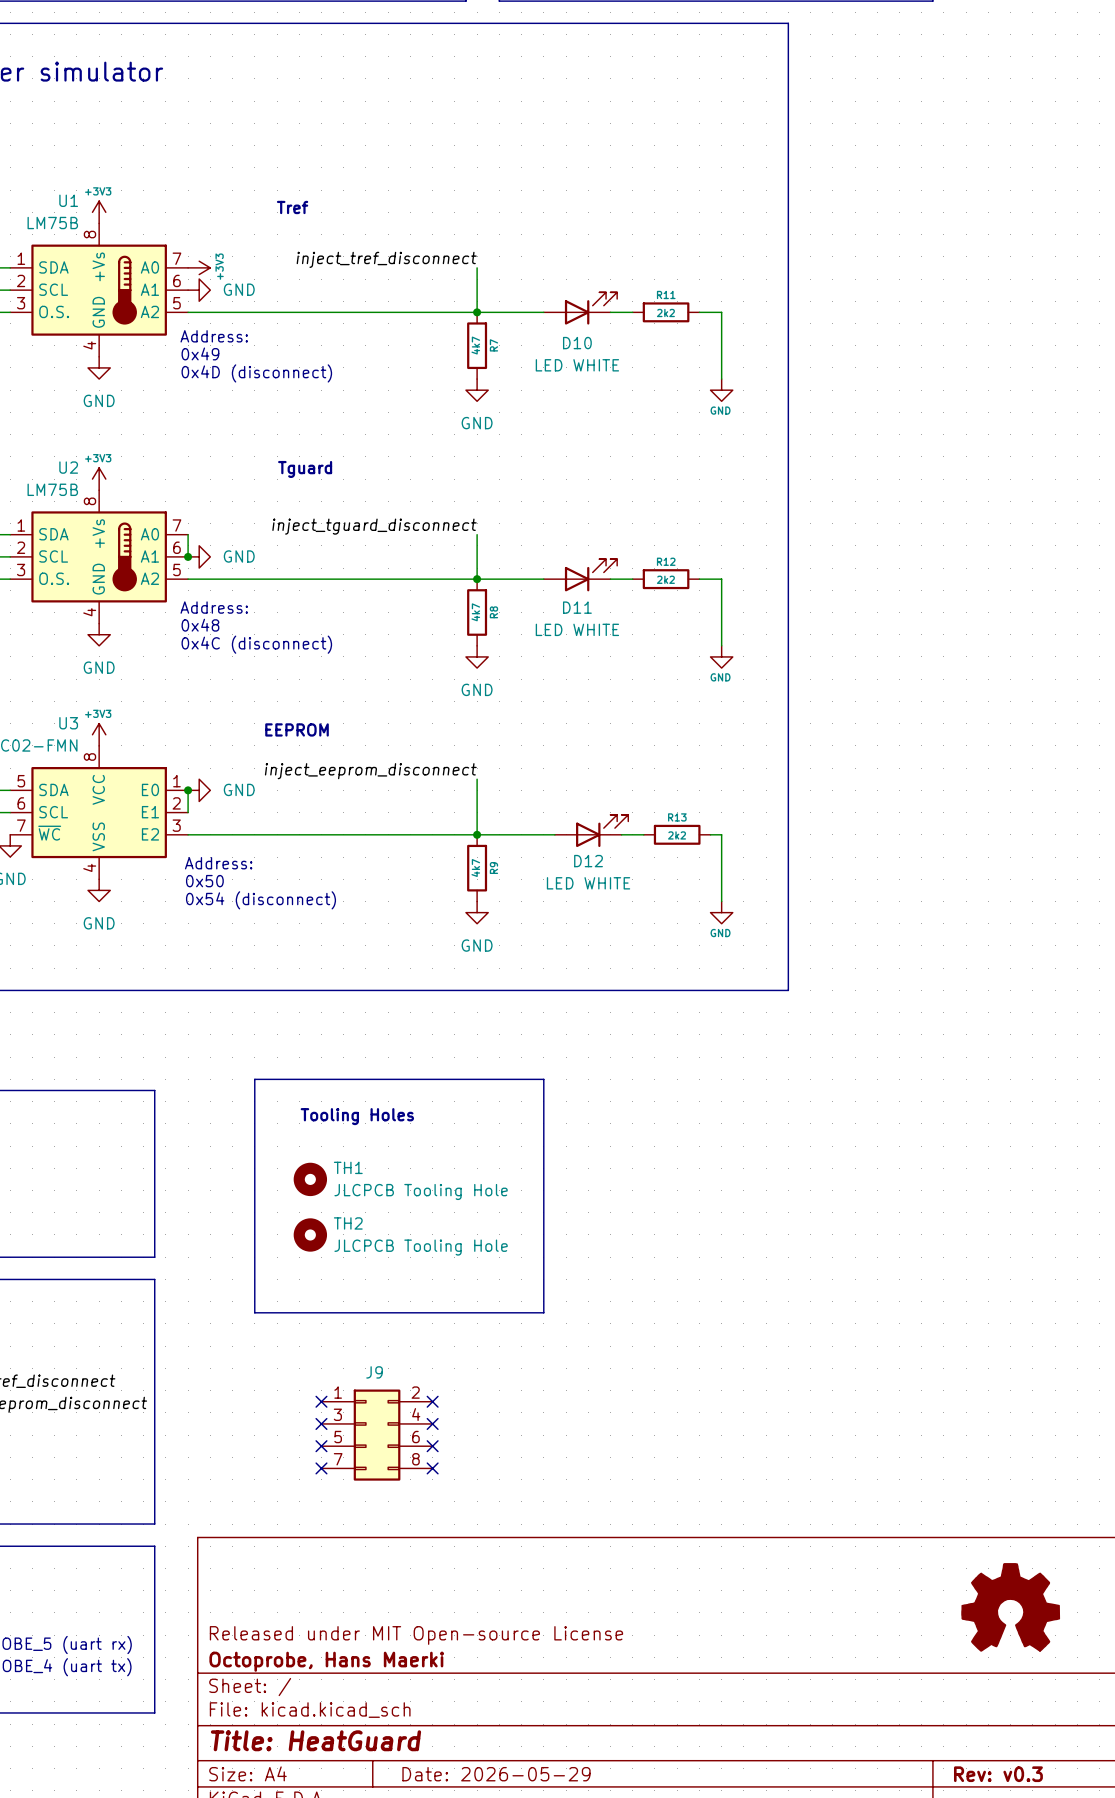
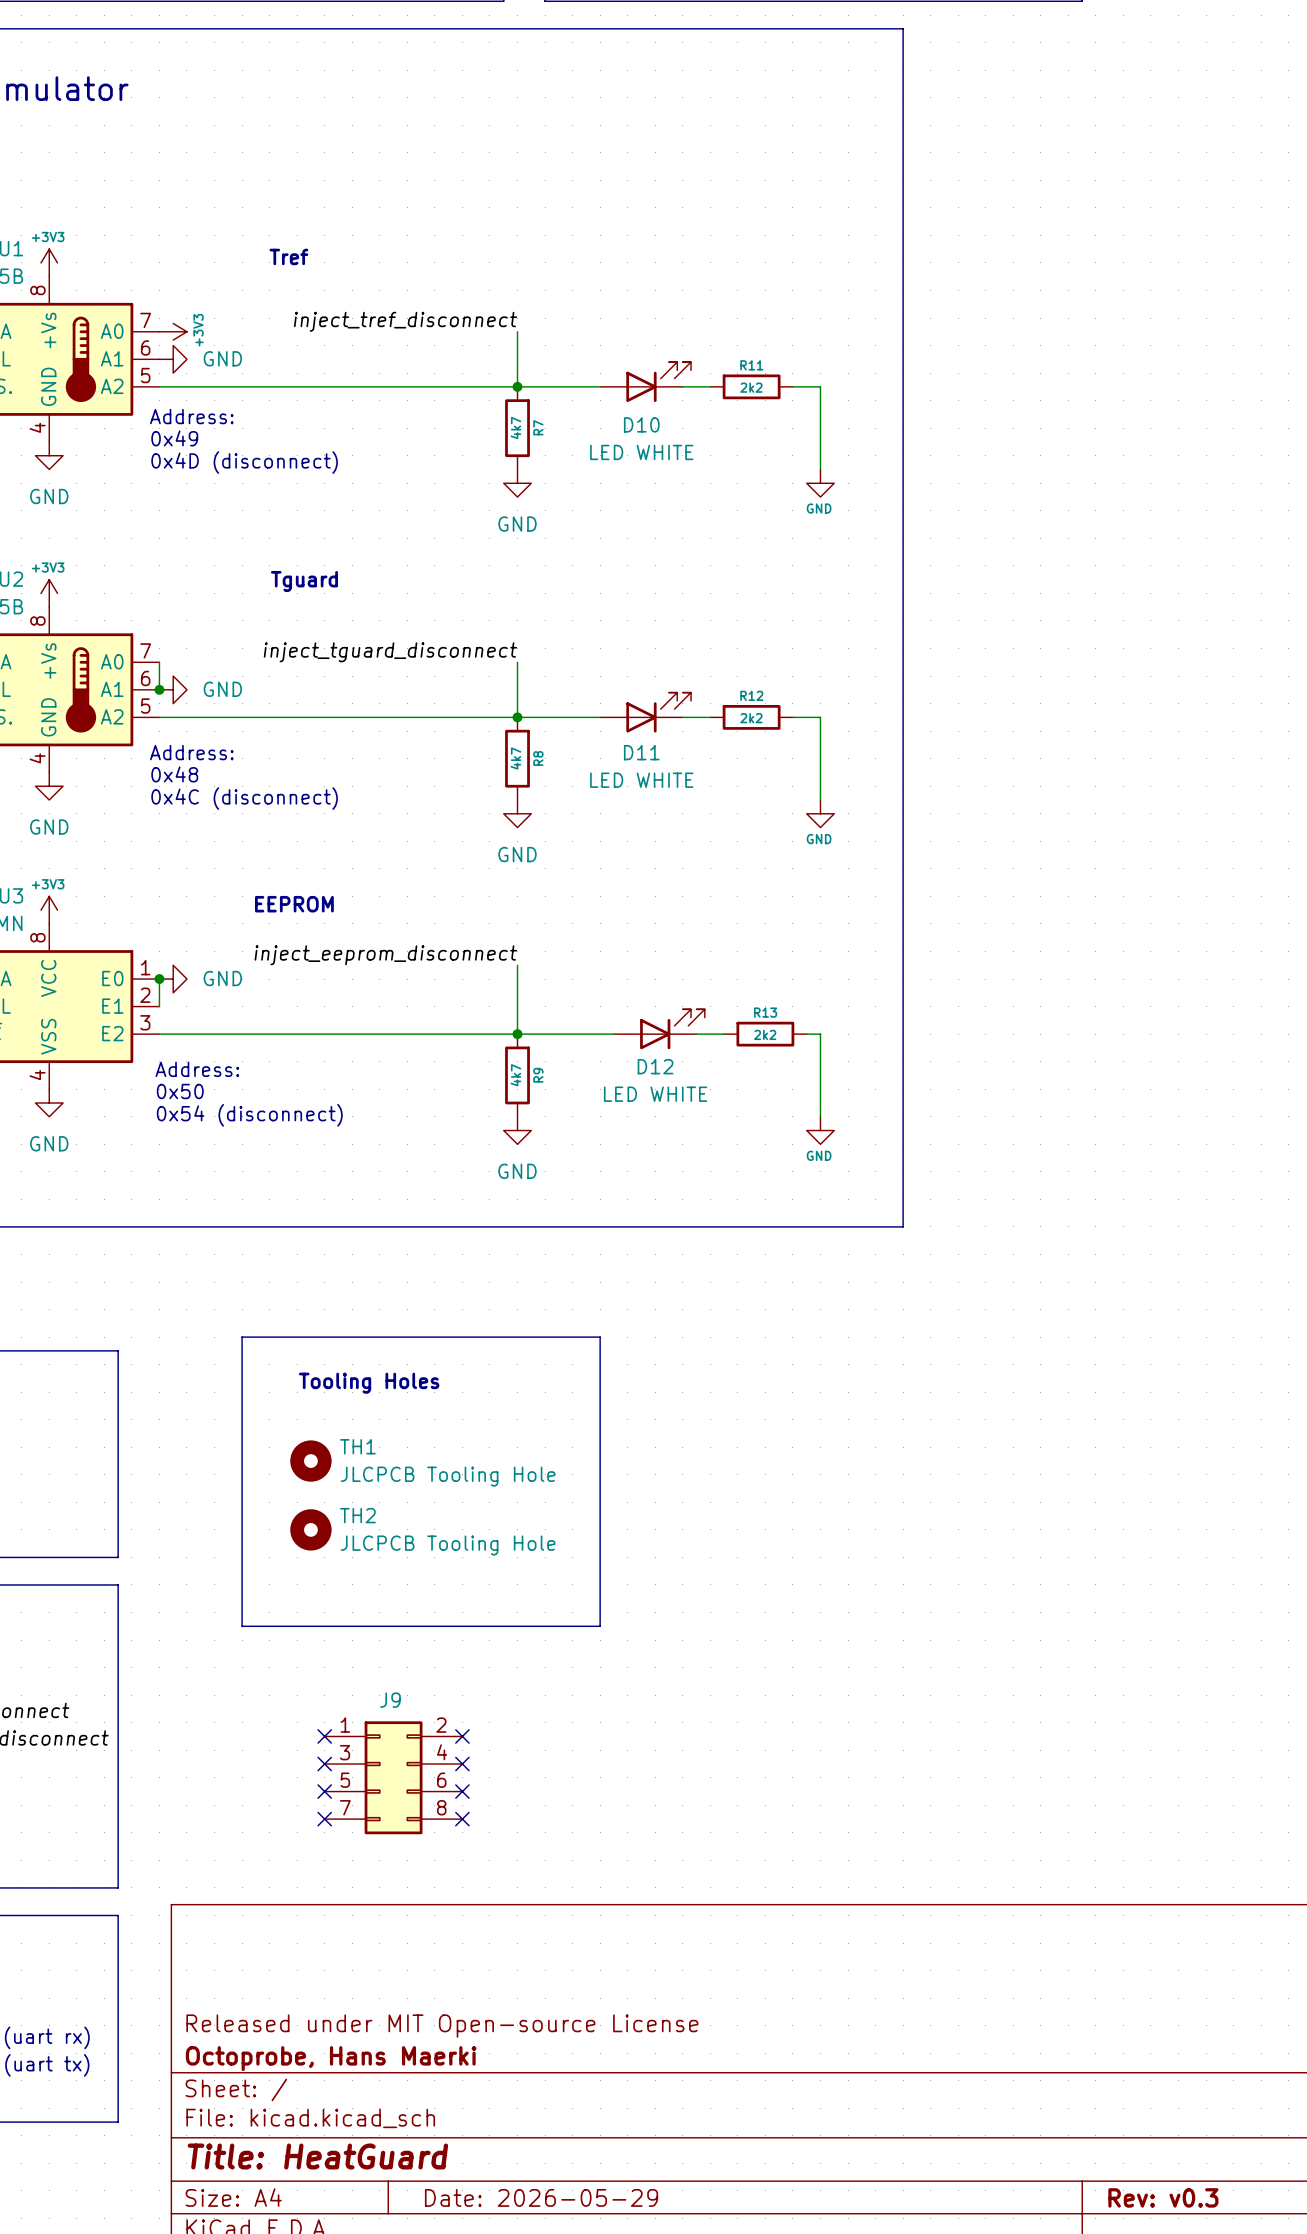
part: (1010, 1607) -> none

